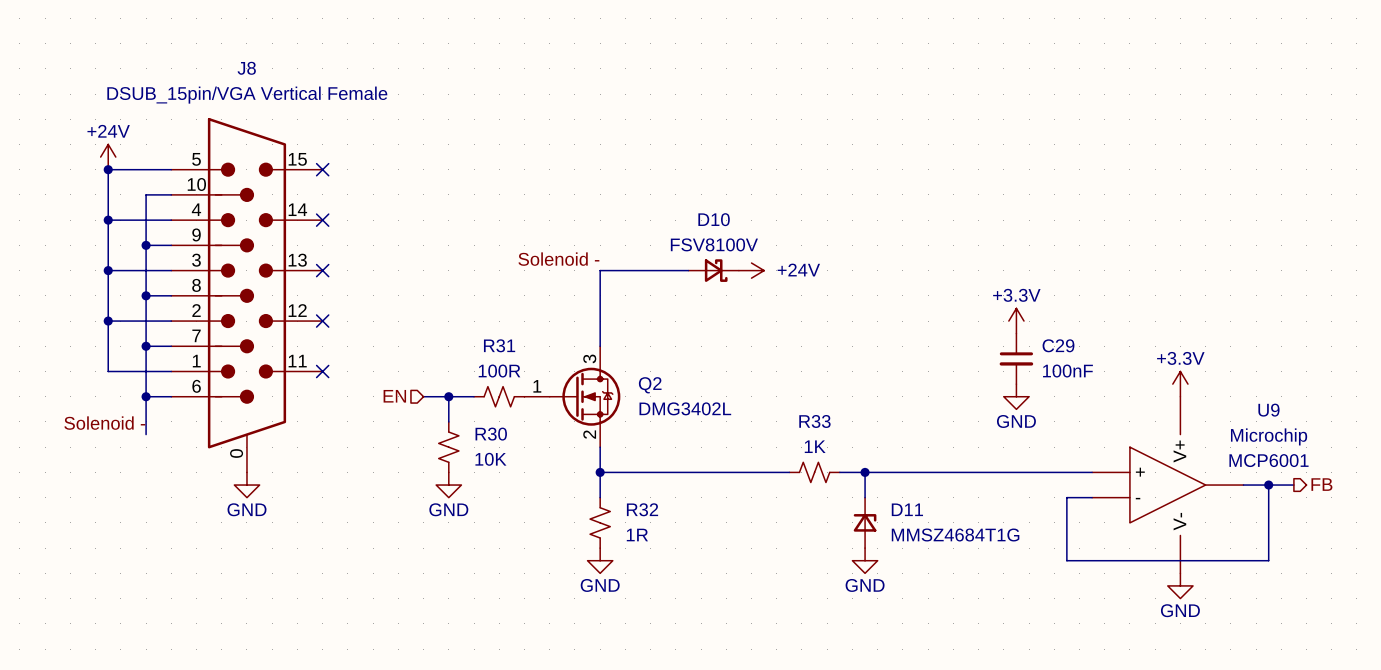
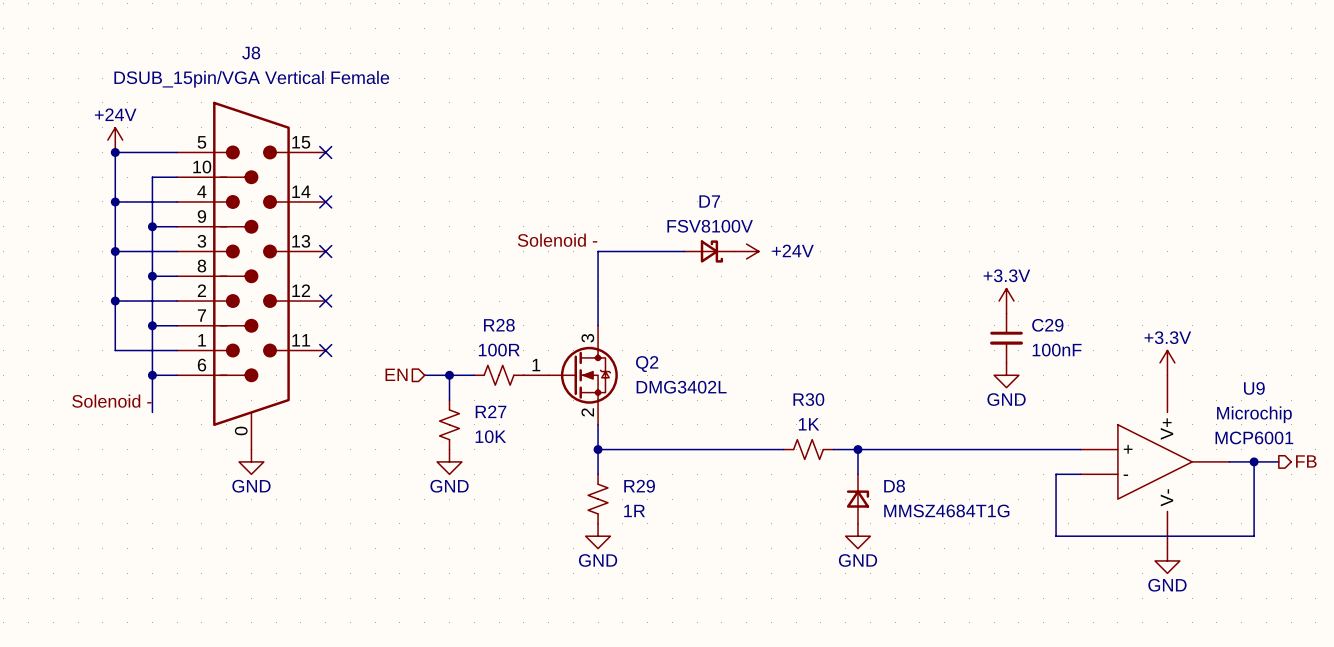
D10 name: D10 (714, 219) -> D7 (709, 201)
R31 name: R31 (499, 345) -> R28 (499, 325)
R33 name: R33 (814, 421) -> R30 (808, 399)
R30 name: R30 (491, 434) -> R27 (491, 411)
R32 name: R32 (642, 509) -> R29 (639, 486)
D11 name: D11 (907, 509) -> D8 (894, 486)

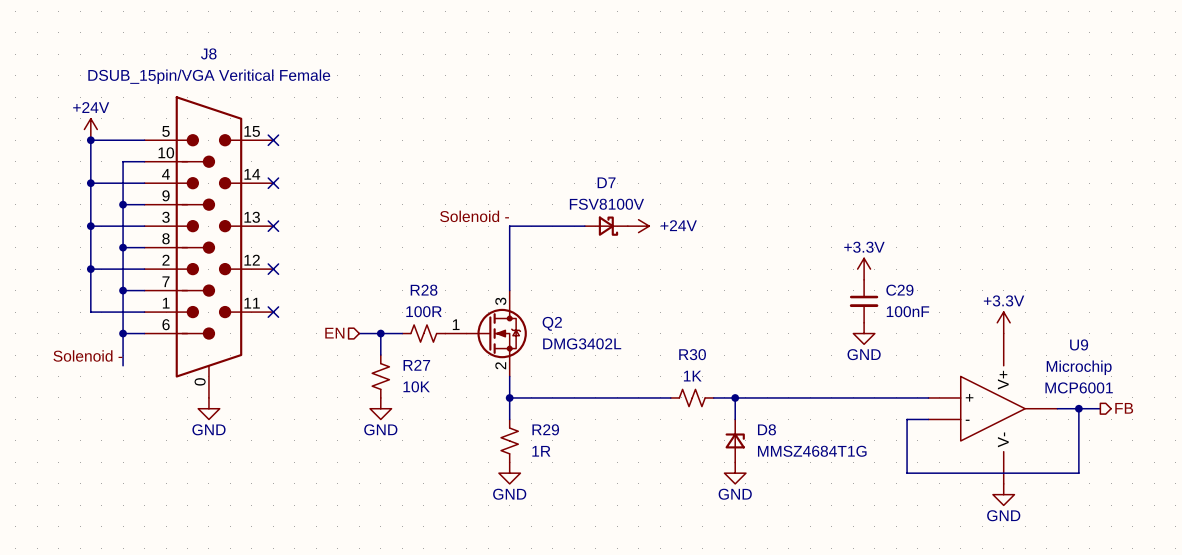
J8 value: DSUB_15pin/VGA Vertical Female (251, 79) -> DSUB_15pin/VGA Veritical Female (209, 76)

